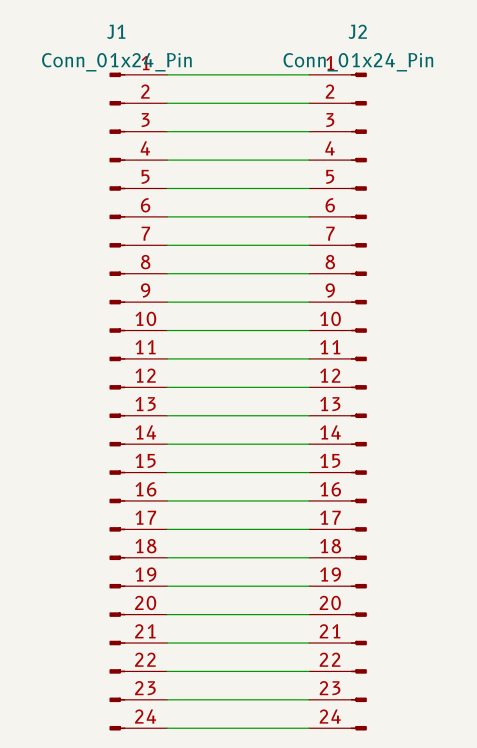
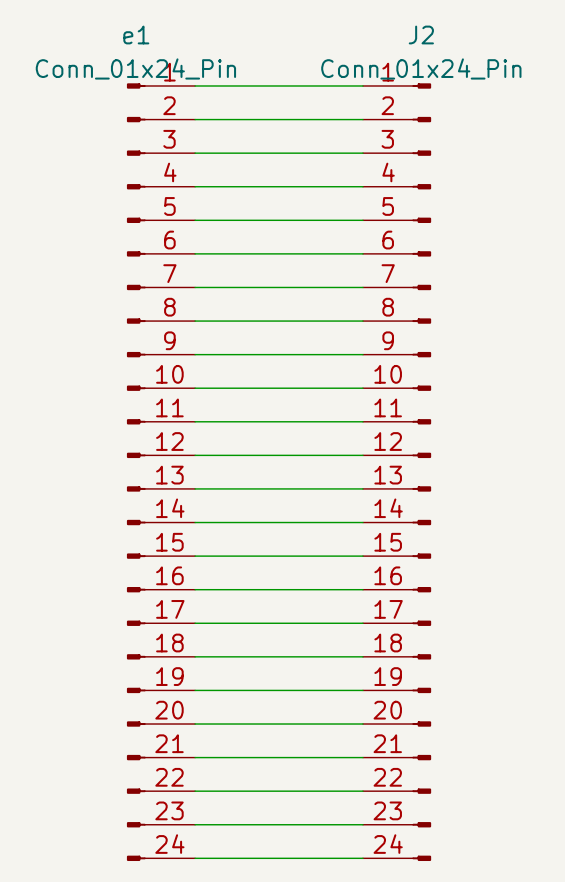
J1 name: J1 (116, 31) -> e1 (136, 35)

